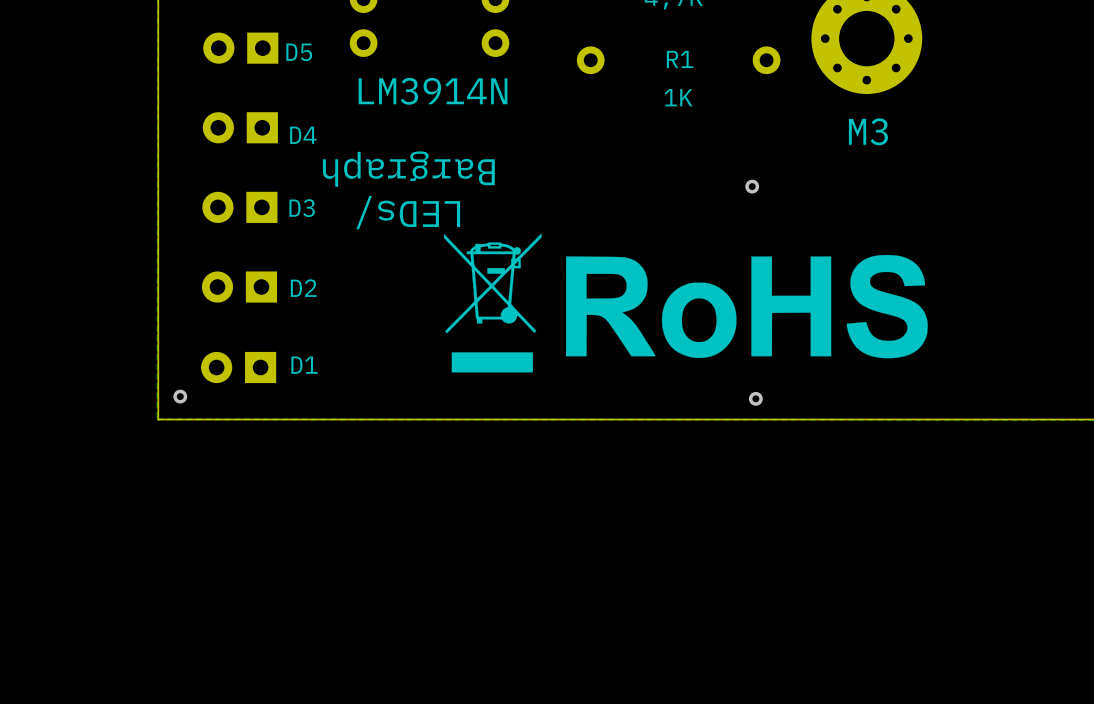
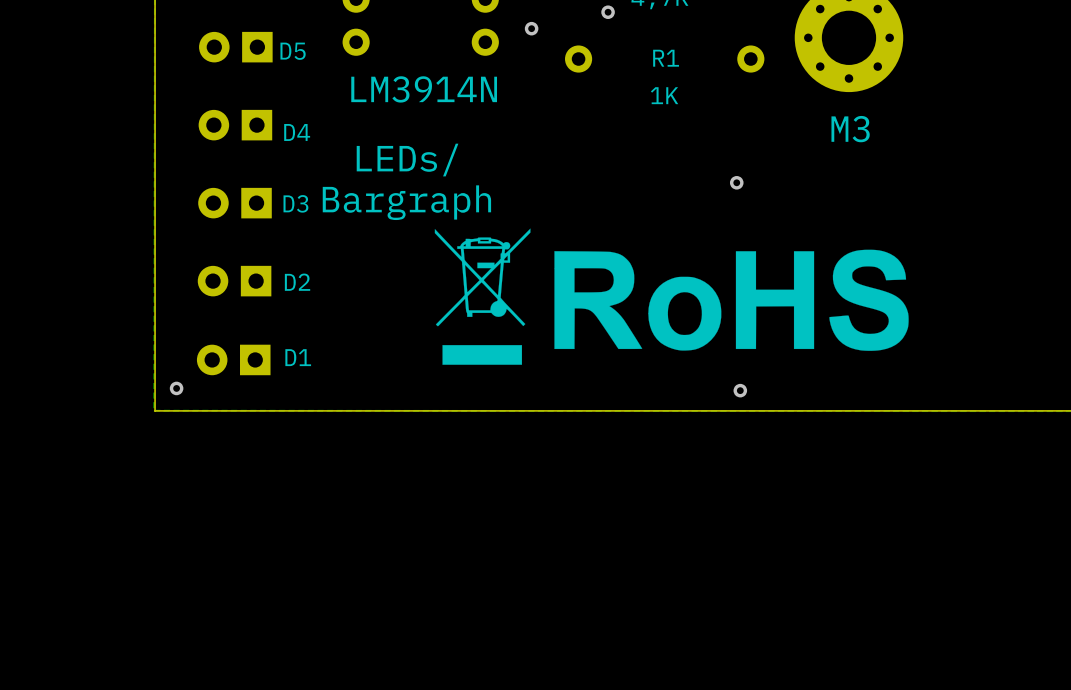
via: none -> (608, 12)
via: none -> (531, 28)
text: Bargraph (408, 169) -> LEDs/ (407, 160)
text: LEDs/ (408, 212) -> Bargraph (406, 202)

